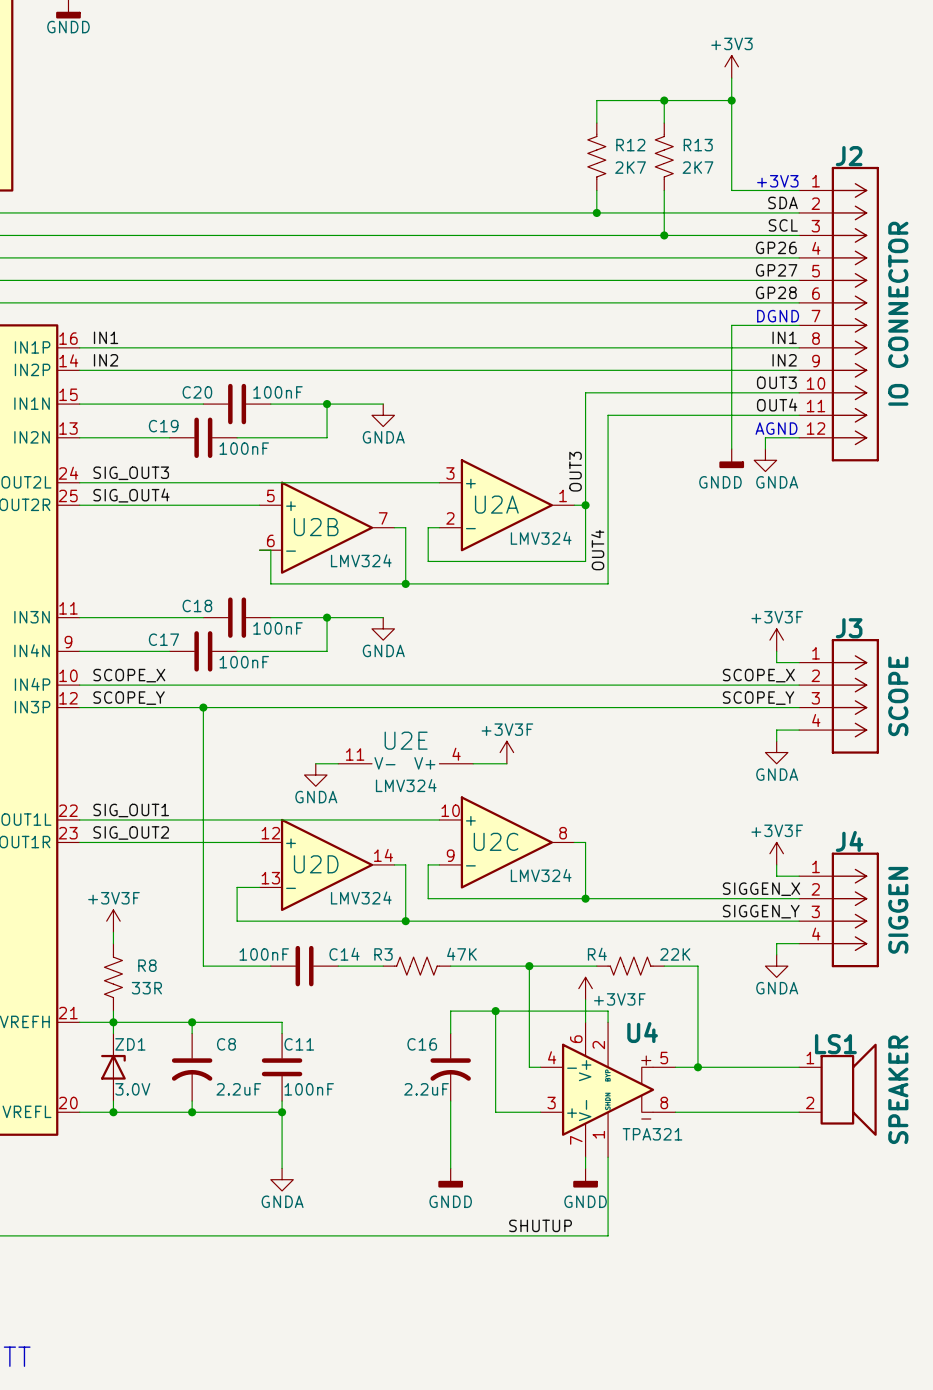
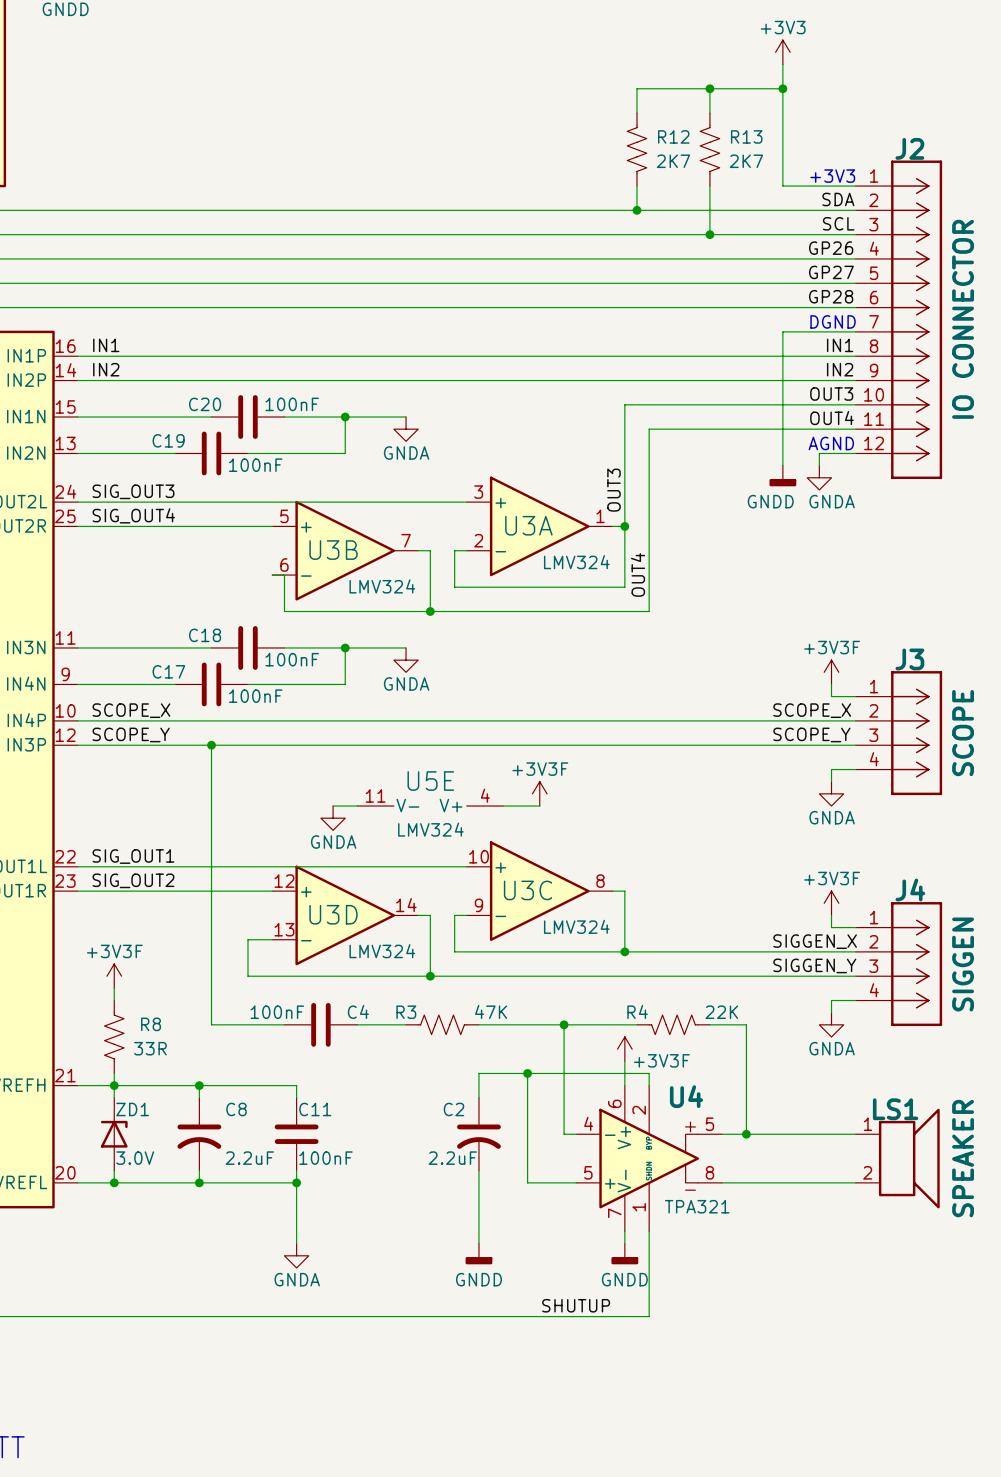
U2A name: U2A (496, 504) -> U3A (528, 525)
U2B name: U2B (316, 527) -> U3B (333, 550)
U2E name: U2E (406, 740) -> U5E (430, 781)
U2C name: U2C (496, 841) -> U3C (528, 890)
U2D name: U2D (316, 864) -> U3D (333, 914)
C14 name: C14 (344, 954) -> C4 (358, 1011)
C16 name: C16 (422, 1044) -> C2 (453, 1109)
U4 pin number: 3 (551, 1102) -> 5 (588, 1172)

